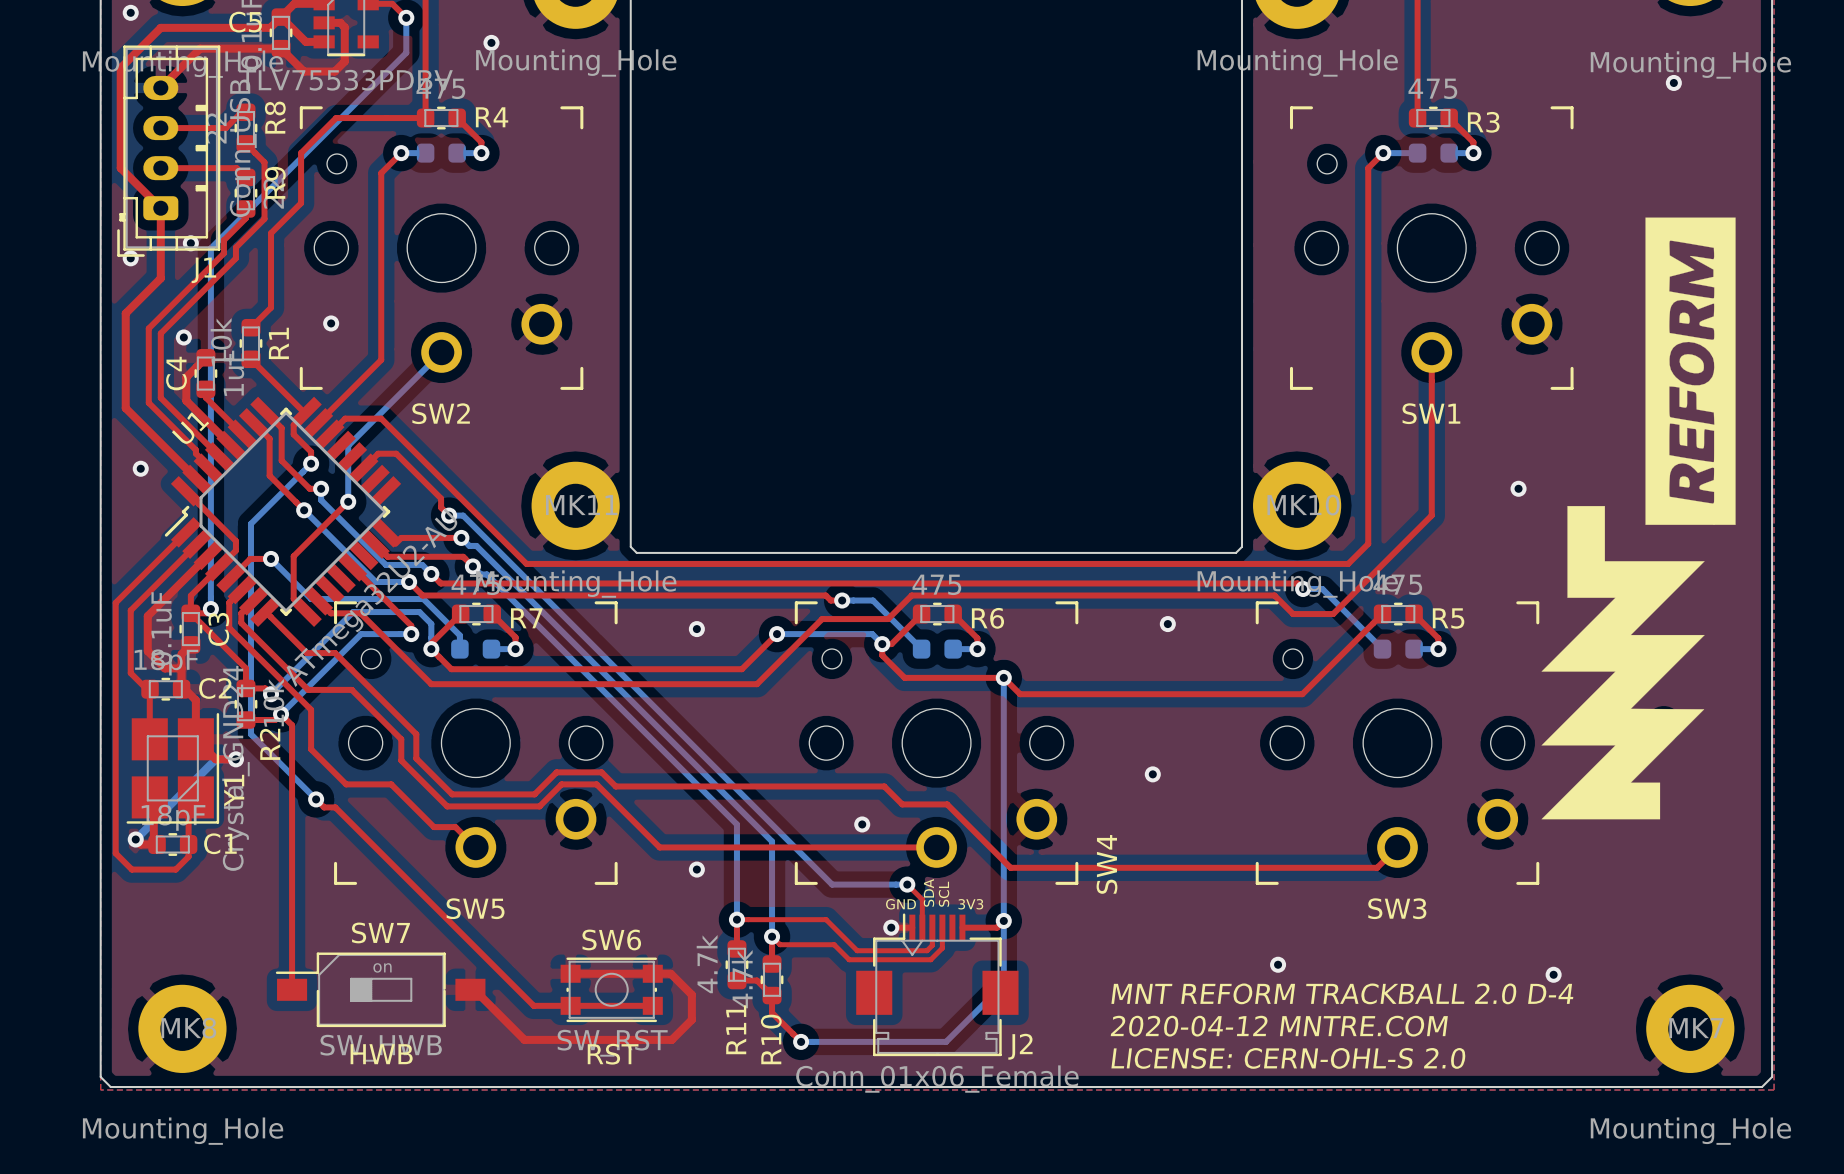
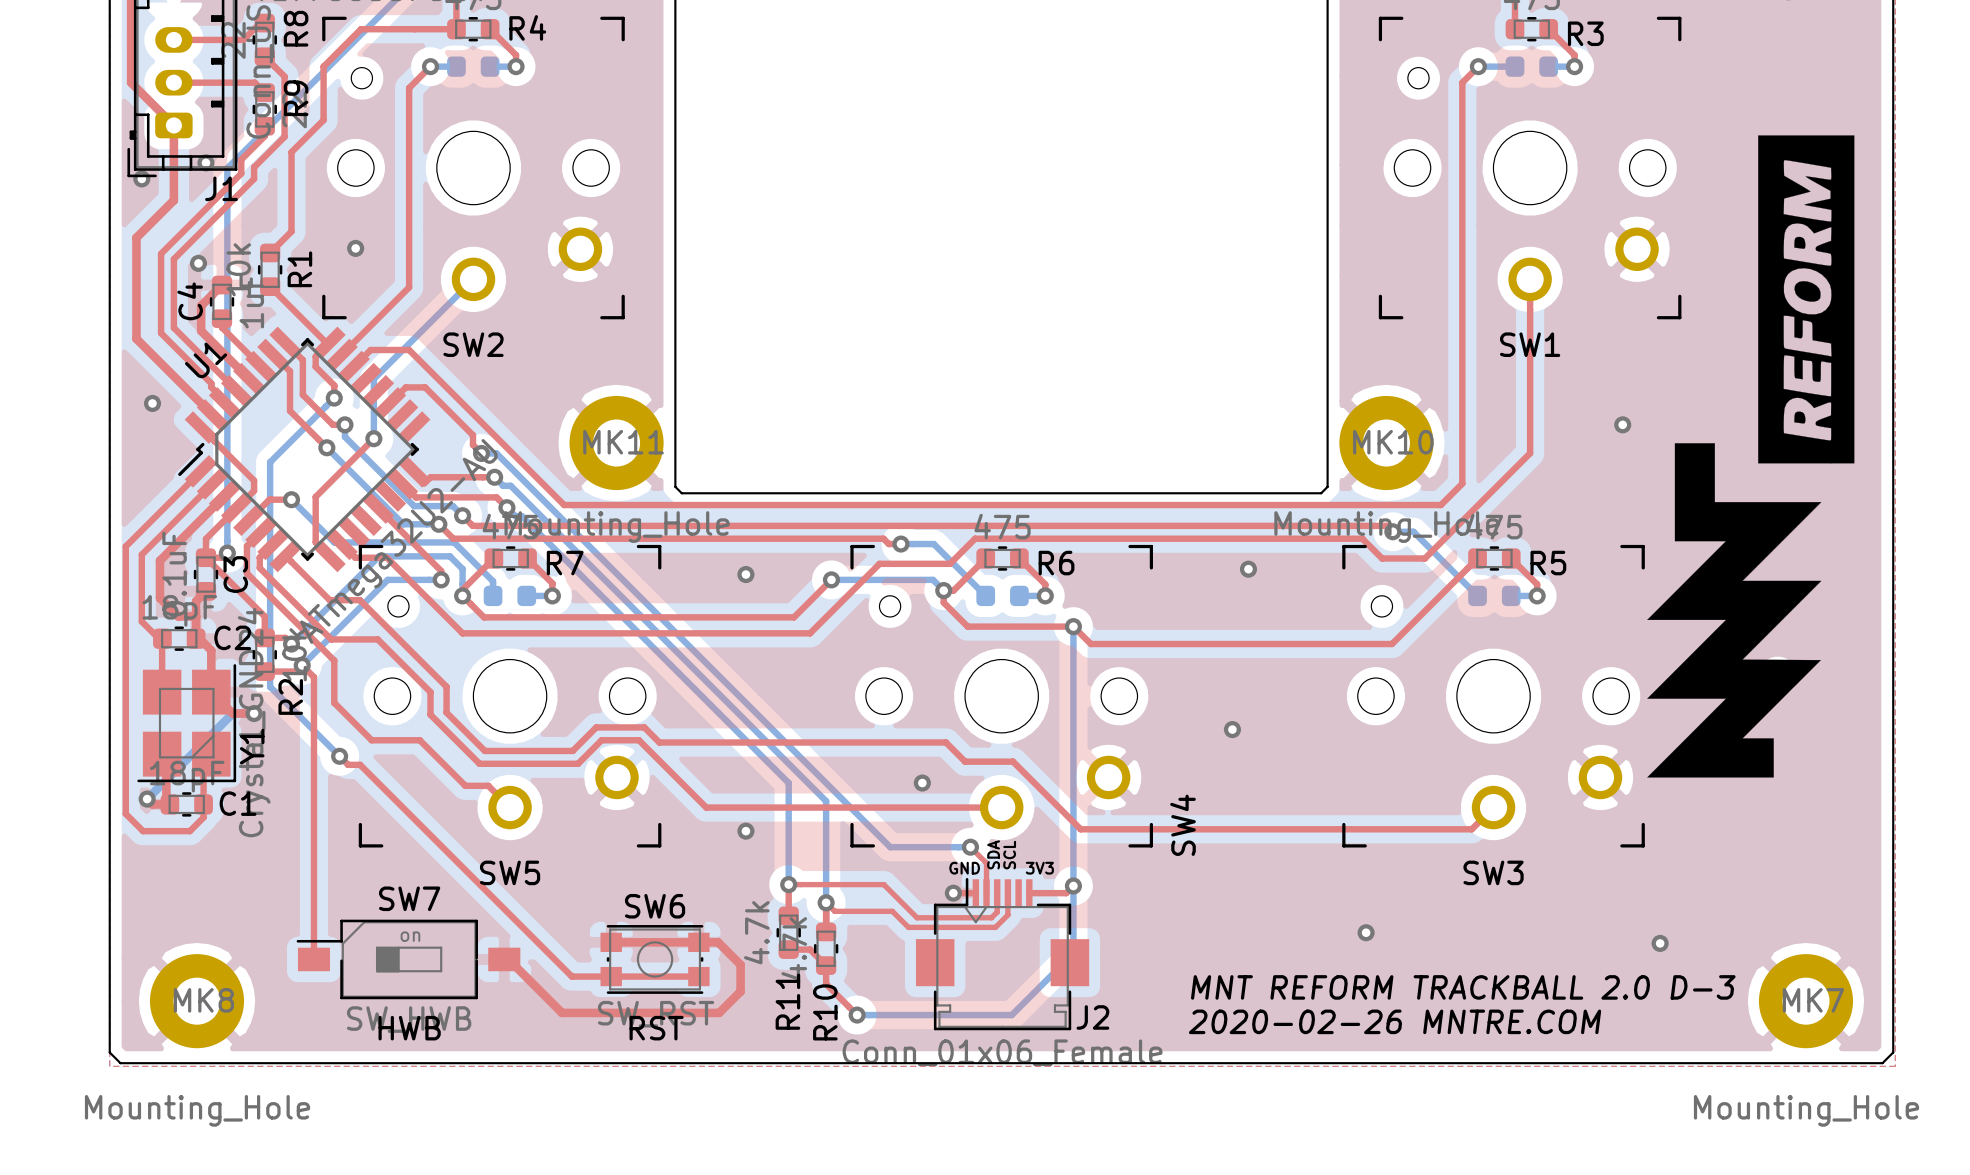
text: MNT REFORM TRACKBALL 2.0 D-4 (1342, 993) -> none
text: 2020-04-12 MNTRE.COM (1279, 1026) -> MNT REFORM TRACKBALL 2.0 D-3 (1463, 987)
text: LICENSE: CERN-OHL-S 2.0 (1288, 1058) -> 2020-02-26 MNTRE.COM (1395, 1021)

